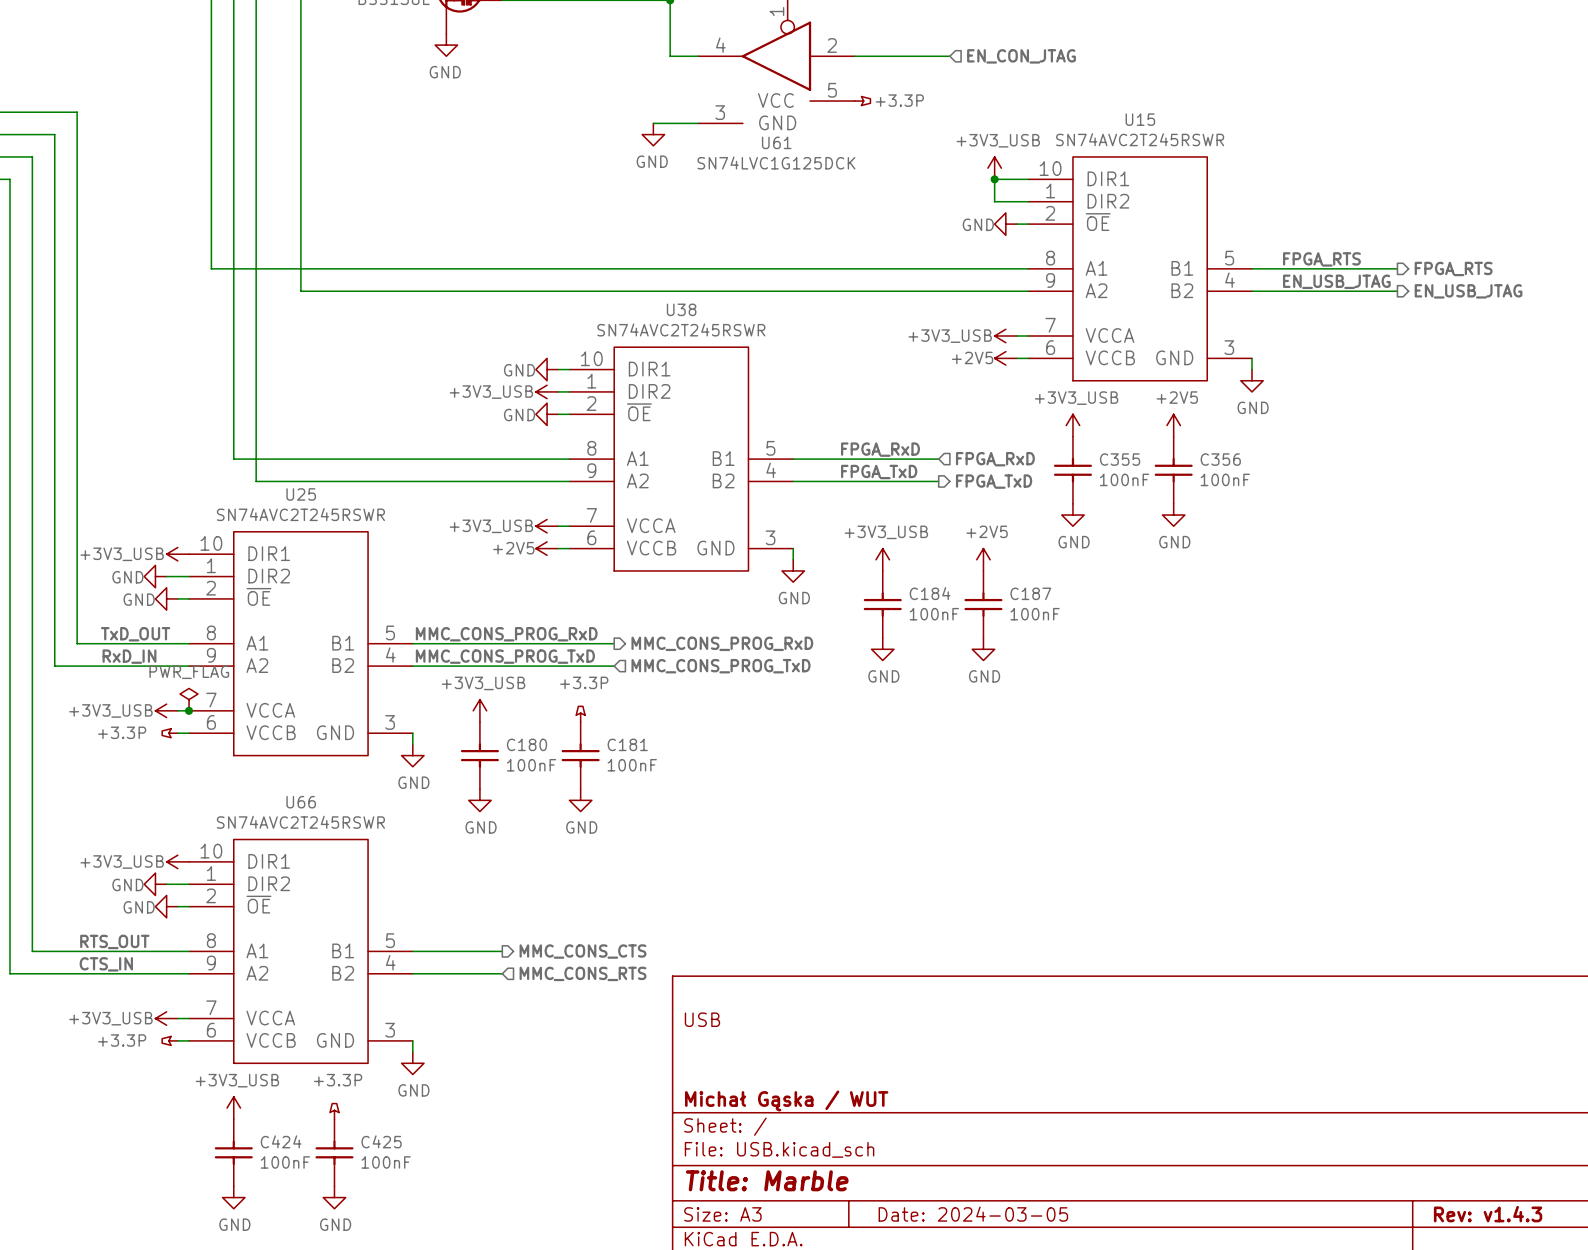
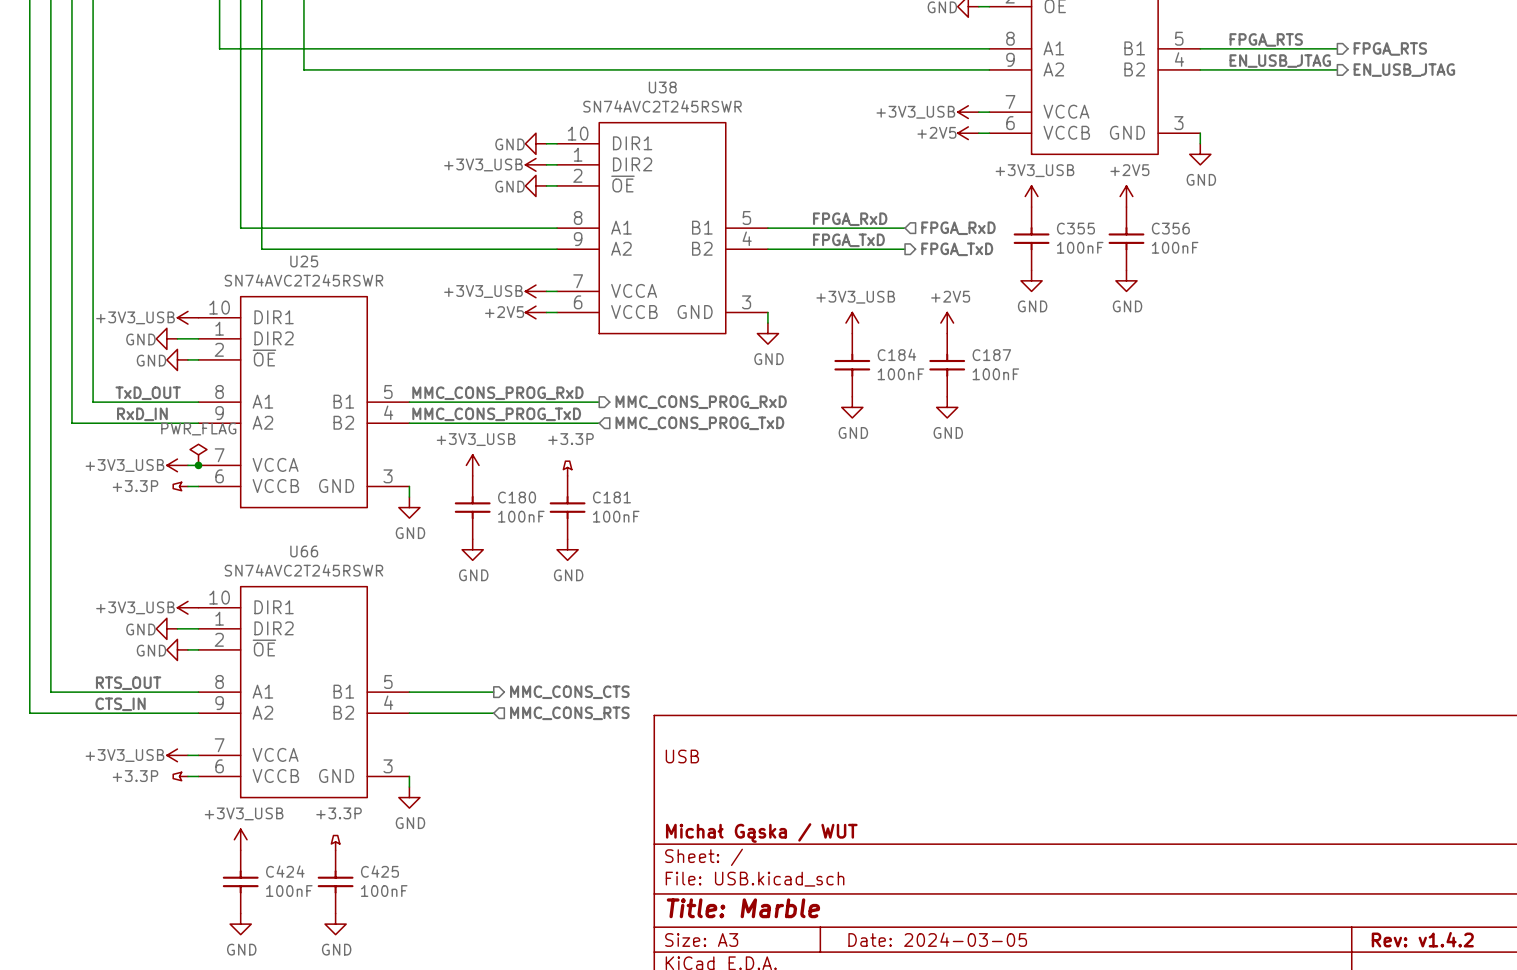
title block: Rev: v1.4.3 (1488, 1214) -> Rev: v1.4.2 (1422, 939)

